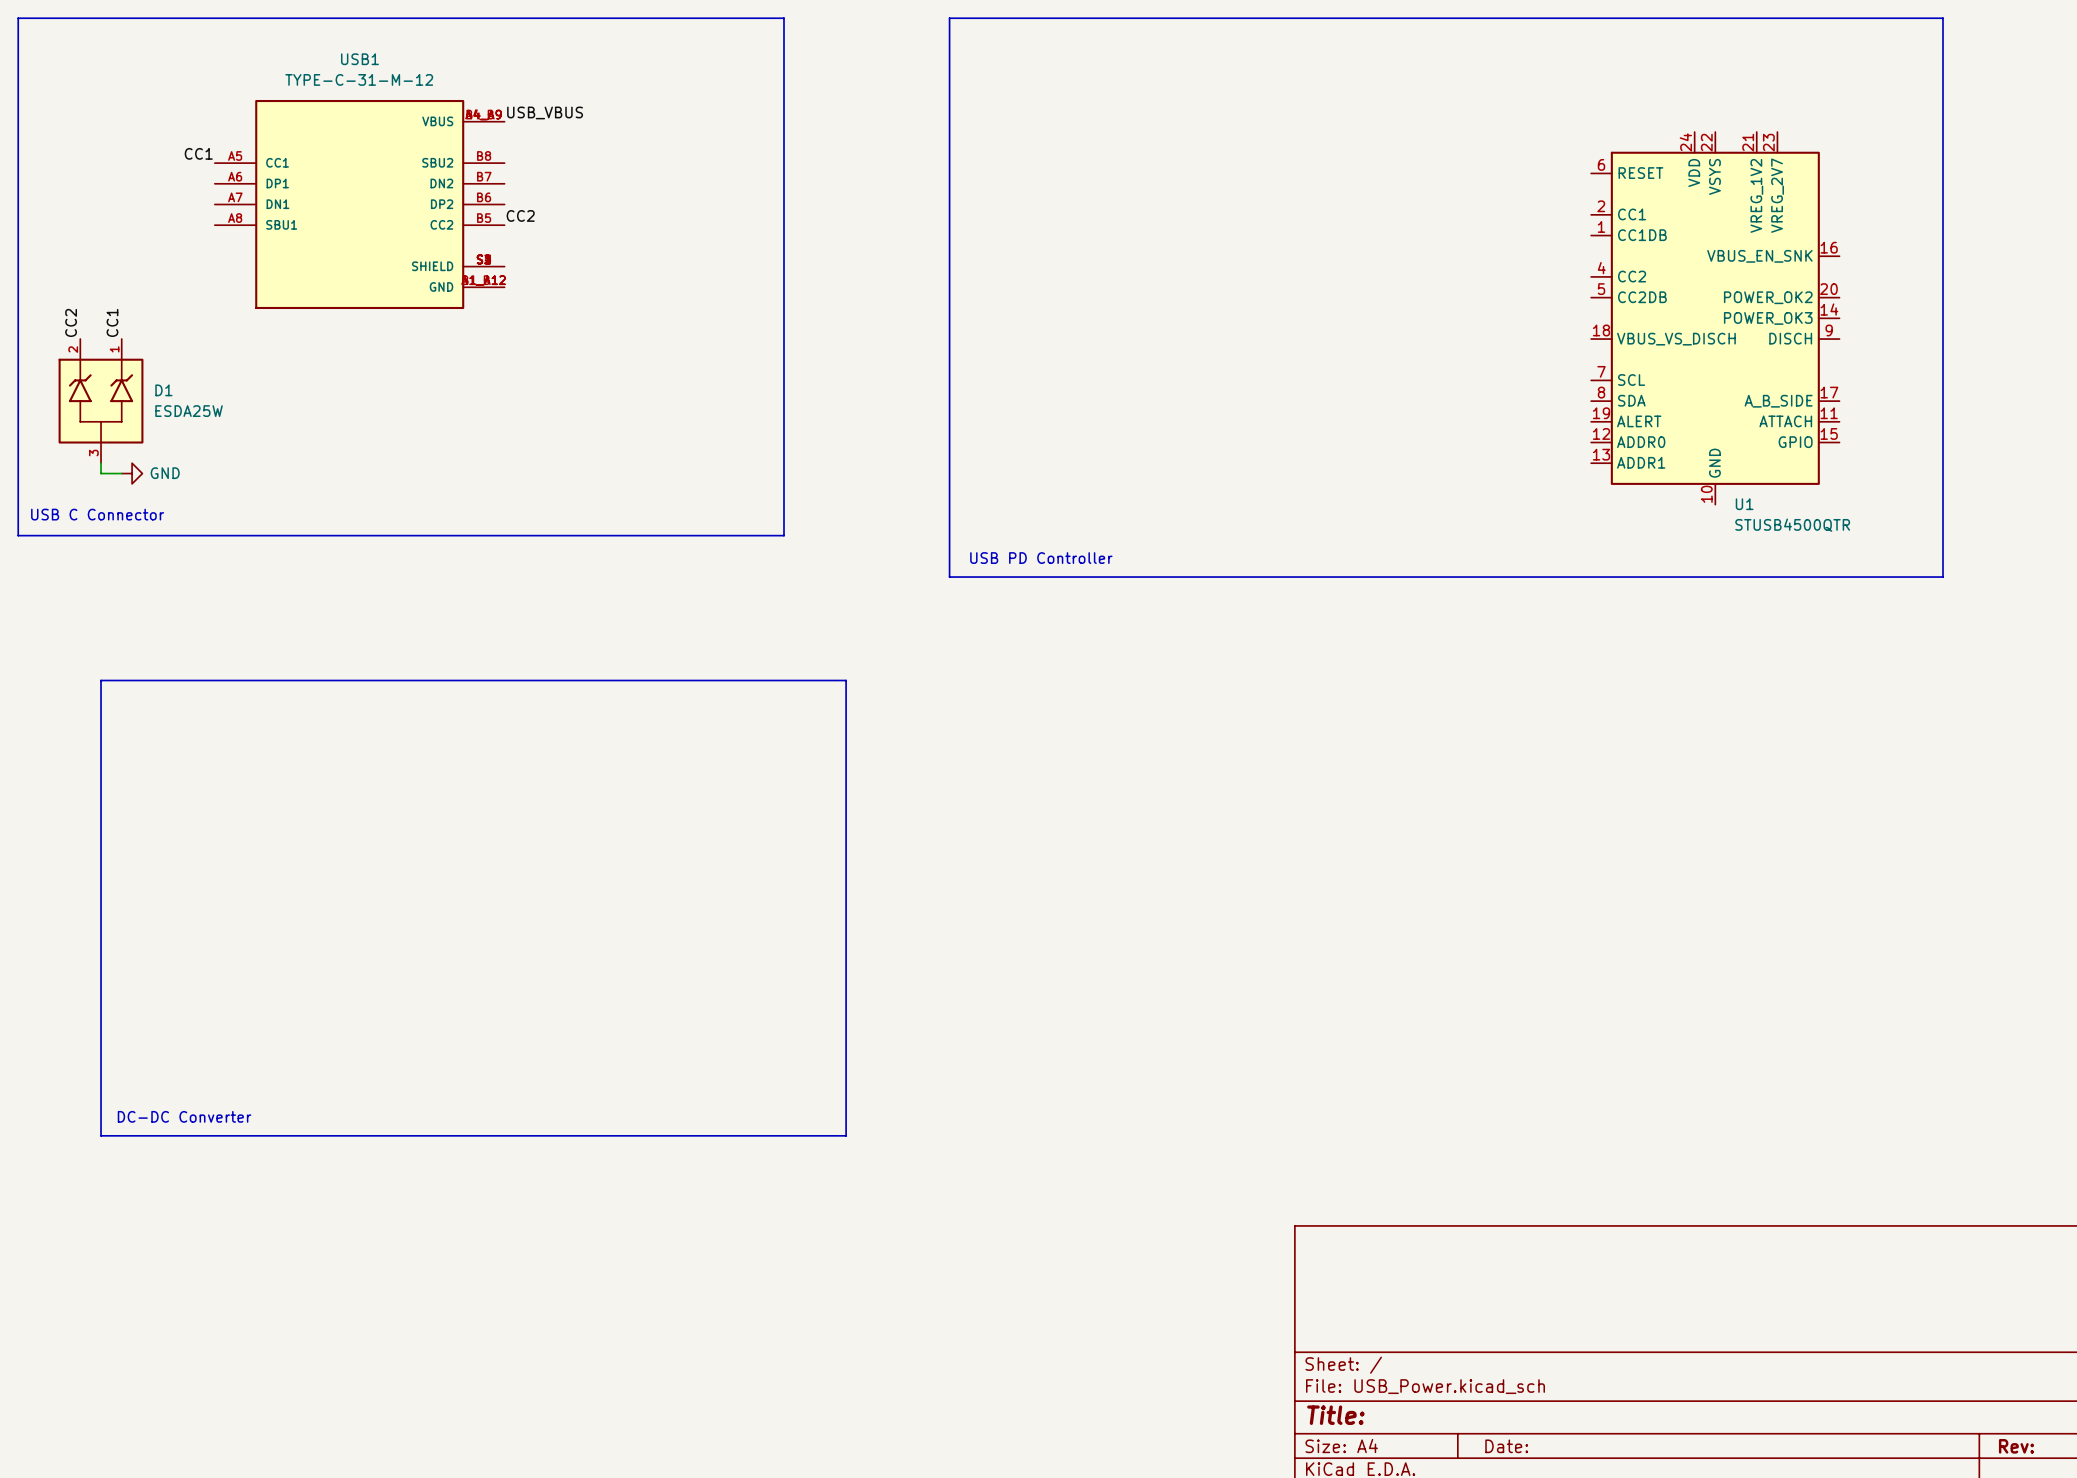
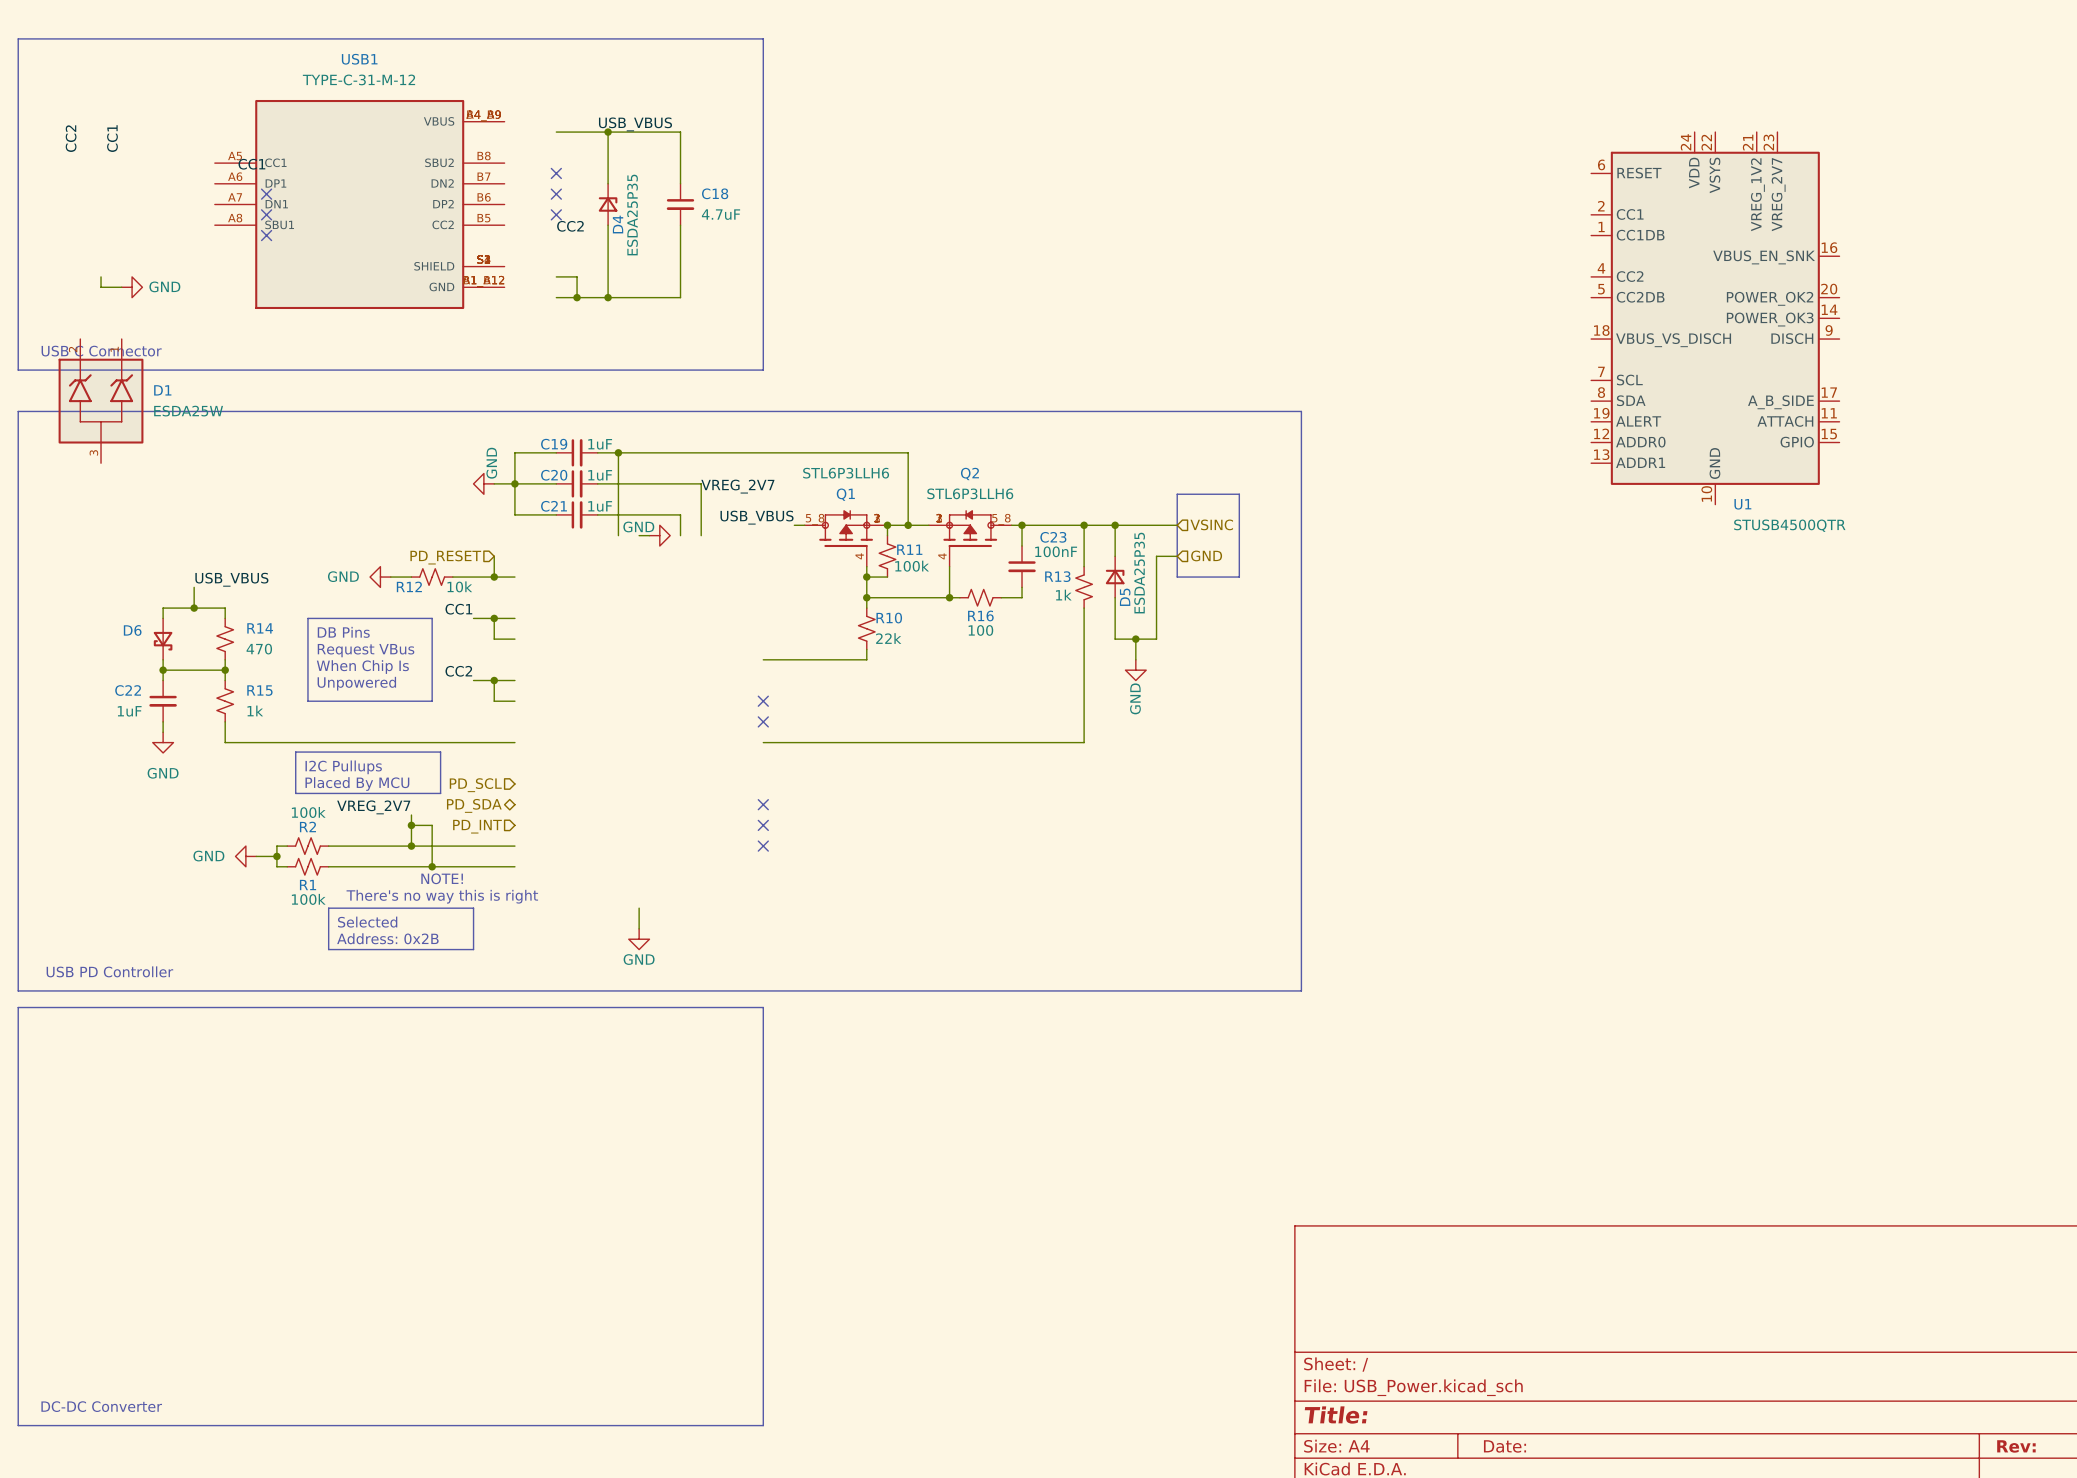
line: (18, 38) (18, 18) (783, 18) (783, 535) (18, 535) -> (18, 38) (763, 38) (763, 370) (18, 370)
label position: USB_VBUS (545, 112) -> USB_VBUS (635, 124)
wire: none -> (556, 132) (680, 132) (680, 183)
wire: none -> (608, 132) (608, 183)
junction: none -> (608, 132)
label: none -> CC1 (112, 138)
label: CC1 (198, 153) -> none
label: none -> CC1 (251, 164)
no-connect mark: none -> (556, 173)
no-connect mark: none -> (266, 194)
no-connect mark: none -> (556, 194)
D4: none -> ESDA25P35 (608, 204)
C18: none -> 4.7uF (680, 204)
no-connect mark: none -> (266, 214)
no-connect mark: none -> (556, 214)
label position: CC2 (520, 215) -> CC2 (570, 226)
wire: none -> (608, 225) (608, 297)
wire: none -> (680, 225) (680, 297) (556, 297)
no-connect mark: none -> (266, 235)
wire: none -> (556, 276) (577, 276) (577, 297)
power symbol: none -> GND (132, 287)
junction: none -> (577, 297)
junction: none -> (608, 297)
label position: CC2 (71, 322) -> CC2 (71, 138)
label: CC1 (112, 322) -> none
line: (18, 370) (18, 411) -> (18, 535) (18, 990) (1301, 990) (1301, 411) (18, 411)
wire: none -> (556, 452) (514, 452) (514, 514) (556, 514)
C19: none -> 1uF (577, 452)
wire: none -> (597, 452) (908, 452) (908, 525)
wire: none -> (618, 452) (618, 535)
junction: none -> (618, 452)
wire: (101, 463) (101, 473) (121, 473) -> (101, 276) (101, 287) (121, 287)
power symbol: GND (132, 473) -> none
power symbol: none -> GND (483, 483)
wire: none -> (494, 483) (556, 483)
junction: none -> (514, 483)
C20: none -> 1uF (577, 483)
wire: none -> (597, 483) (701, 483) (701, 535)
label: none -> VREG_2V7 (737, 486)
text position: USB C Connector (97, 514) -> USB C Connector (101, 351)
C21: none -> 1uF (577, 514)
wire: none -> (597, 514) (680, 514) (680, 535)
label: none -> USB_VBUS (757, 517)
hierarchical label: none -> VSINC (1211, 524)
wire: none -> (794, 525) (804, 525)
junction: none -> (887, 525)
junction: none -> (908, 525)
wire: none -> (928, 525) (887, 525) (887, 535)
wire: none -> (1011, 525) (1177, 525)
wire: none -> (1022, 525) (1022, 545)
junction: none -> (1022, 525)
wire: none -> (1084, 525) (1084, 566)
junction: none -> (1084, 525)
wire: none -> (1115, 525) (1115, 556)
junction: none -> (1115, 525)
power symbol: none -> GND (659, 535)
Q1: none -> STL6P3LLH6 (846, 538)
Q2: none -> STL6P3LLH6 (970, 538)
hierarchical label: none -> GND (1206, 555)
hierarchical label: none -> PD_RESET (445, 557)
wire: none -> (494, 556) (494, 577)
R11: none -> 100k (887, 556)
wire: none -> (1177, 556) (1156, 556) (1156, 639) (1115, 639) (1115, 597)
text: USB PD Controller (1041, 558) -> none
wire: none -> (866, 566) (866, 608)
wire: none -> (949, 566) (949, 597)
C23: none -> 100nF (1022, 566)
power symbol: none -> GND (380, 577)
wire: none -> (390, 577) (411, 577)
R12: none -> 10k (432, 577)
wire: none -> (452, 577) (514, 577)
junction: none -> (494, 577)
wire: none -> (866, 577) (887, 577)
junction: none -> (866, 577)
D5: none -> ESDA25P35 (1115, 577)
line: (1177, 577) (949, 577) (949, 18) (1942, 18) (1942, 577) (1239, 577) -> (1177, 577) (1177, 494) (1239, 494) (1239, 577)
label: none -> USB_VBUS (231, 579)
wire: none -> (194, 587) (194, 608)
wire: none -> (1022, 587) (1022, 597) (1001, 597)
R13: none -> 1k (1084, 587)
wire: none -> (866, 597) (959, 597)
junction: none -> (866, 597)
junction: none -> (949, 597)
R16: none -> 100 (980, 597)
junction: none -> (194, 608)
wire: none -> (1084, 608) (1084, 742) (763, 742)
label: none -> CC1 (458, 609)
wire: none -> (163, 618) (163, 608) (225, 608) (225, 618)
line: none -> (307, 618) (432, 618) (432, 701) (307, 701) (307, 618)
wire: none -> (473, 618) (514, 618)
wire: none -> (494, 618) (494, 639) (514, 639)
junction: none -> (494, 618)
R10: none -> 22k (866, 628)
text: none -> DB Pins (343, 632)
D6: none -> (163, 639)
R14: none -> 470 (225, 639)
wire: none -> (1135, 639) (1135, 659)
junction: none -> (1135, 639)
wire: none -> (866, 649) (866, 659) (763, 659)
text: none -> Request VBus (366, 650)
wire: none -> (163, 659) (163, 680)
wire: none -> (225, 659) (225, 680)
text: none -> When Chip Is (362, 667)
wire: none -> (163, 670) (225, 670)
junction: none -> (163, 670)
junction: none -> (225, 670)
power symbol: none -> GND (1135, 670)
label: none -> CC2 (458, 671)
line: (101, 680) (846, 680) (846, 1135) (101, 1135) (101, 680) -> none
wire: none -> (494, 680) (494, 701) (514, 701)
junction: none -> (494, 680)
text: none -> Unpowered (356, 683)
C22: none -> 1uF (163, 701)
R15: none -> 1k (225, 701)
no-connect mark: none -> (763, 701)
wire: none -> (163, 721) (163, 732)
wire: none -> (225, 721) (225, 742) (514, 742)
no-connect mark: none -> (763, 721)
power symbol: none -> GND (163, 742)
line: none -> (295, 752) (440, 752) (440, 793) (295, 793) (295, 752)
text: none -> I2C Pullups (343, 767)
text: none -> Placed By MCU (357, 784)
hierarchical label: none -> PD_SCL (475, 785)
hierarchical label: none -> PD_SDA (474, 805)
no-connect mark: none -> (763, 804)
label: none -> VREG_2V7 (373, 807)
wire: none -> (411, 815) (411, 846)
wire: none -> (411, 825) (432, 825) (432, 866)
junction: none -> (411, 825)
hierarchical label: none -> PD_INT (477, 826)
no-connect mark: none -> (763, 825)
wire: none -> (287, 846) (276, 846) (276, 866) (287, 866)
R2: none -> 100k (307, 846)
wire: none -> (328, 846) (514, 846)
junction: none -> (411, 846)
no-connect mark: none -> (763, 846)
power symbol: none -> GND (245, 856)
wire: none -> (256, 856) (276, 856)
junction: none -> (276, 856)
R1: none -> 100k (307, 866)
wire: none -> (328, 866) (514, 866)
junction: none -> (432, 866)
text: none -> NOTE! (442, 878)
text: none -> There's no way this is right (442, 896)
line: none -> (328, 908) (473, 908) (473, 949) (328, 949) (328, 908)
wire: none -> (639, 908) (639, 928)
text: none -> Selected (367, 922)
text: none -> Address: 0x2B (387, 938)
power symbol: none -> GND (639, 939)
text: none -> USB PD Controller (109, 971)
line: none -> (18, 1007) (18, 1425) (763, 1425) (763, 1007) (18, 1007)
text: DC-DC Converter (184, 1116) -> none
text: none -> DC-DC Converter (101, 1406)

